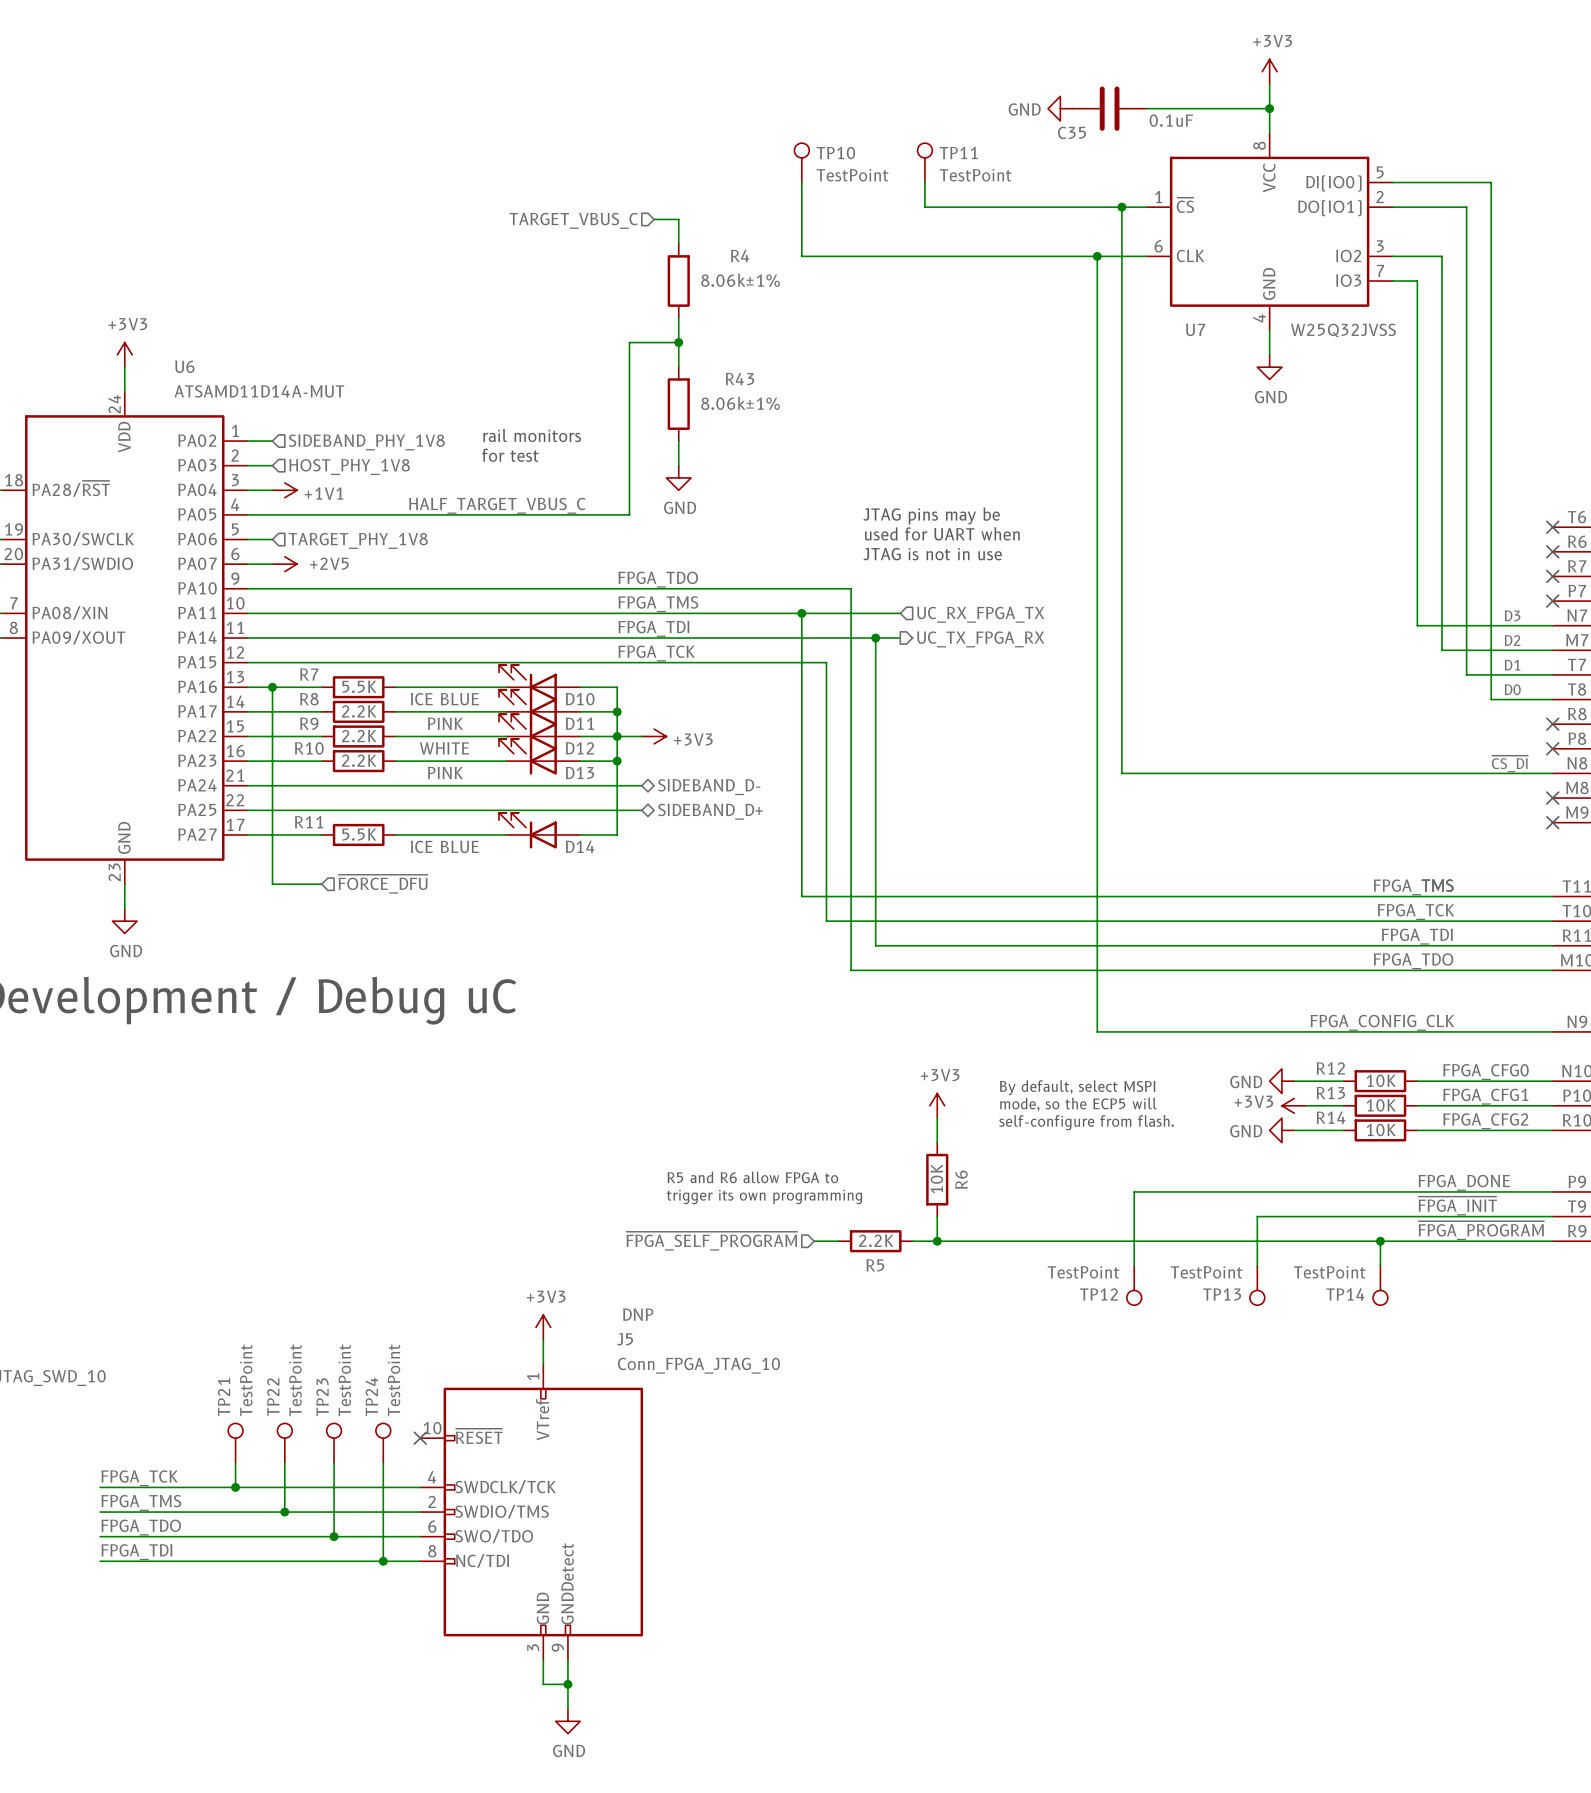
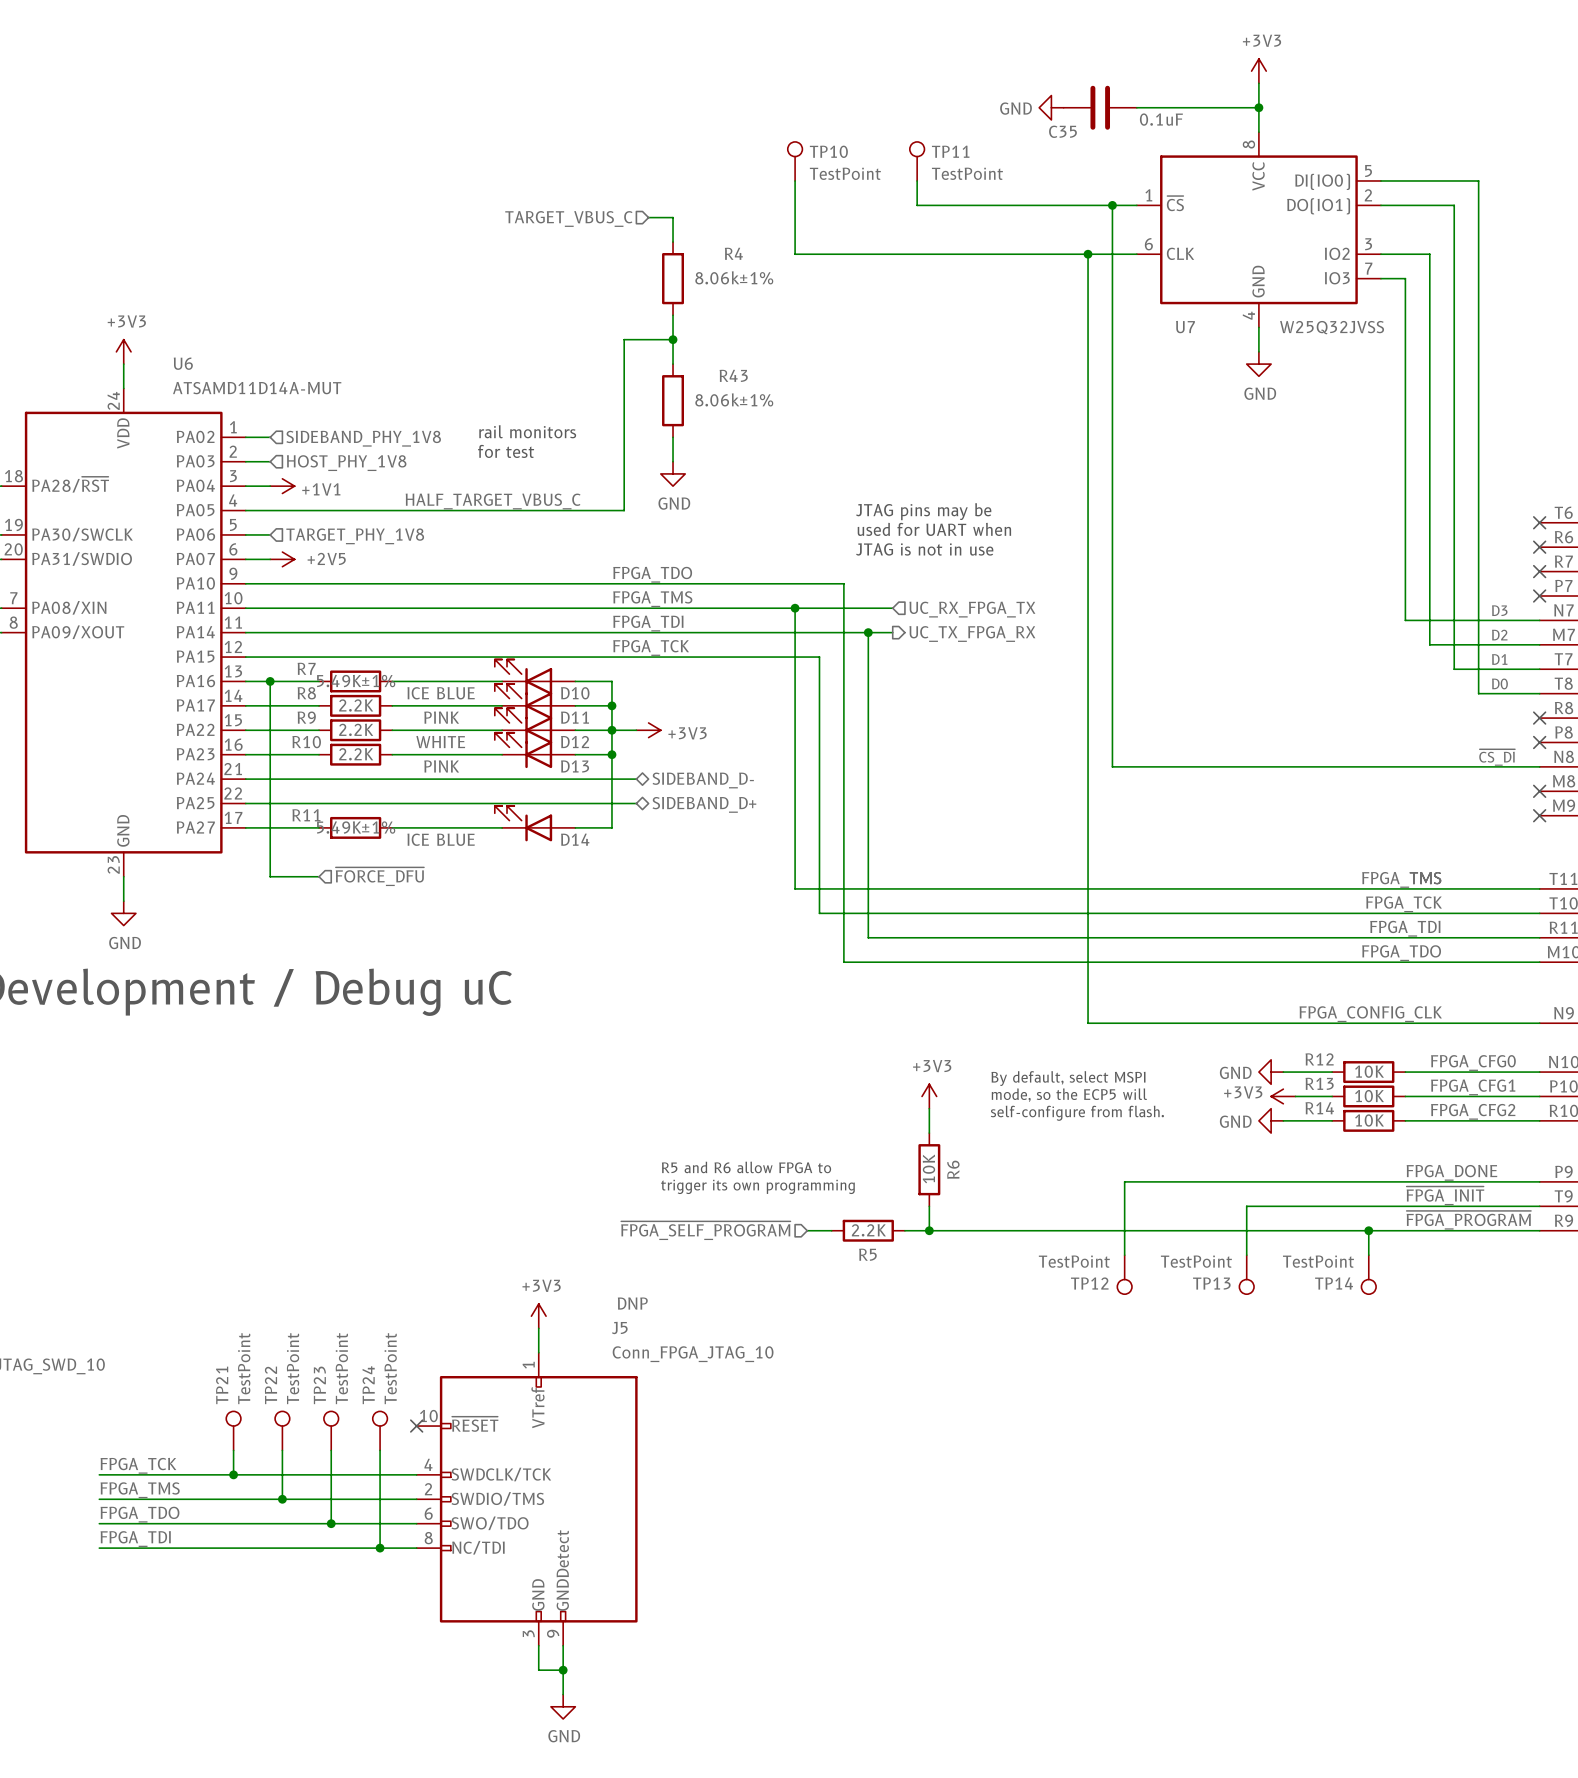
R7 value: 5.5K (359, 686) -> 5.49K±1% (356, 681)
R11 value: 5.5K (359, 834) -> 5.49K±1% (356, 827)

